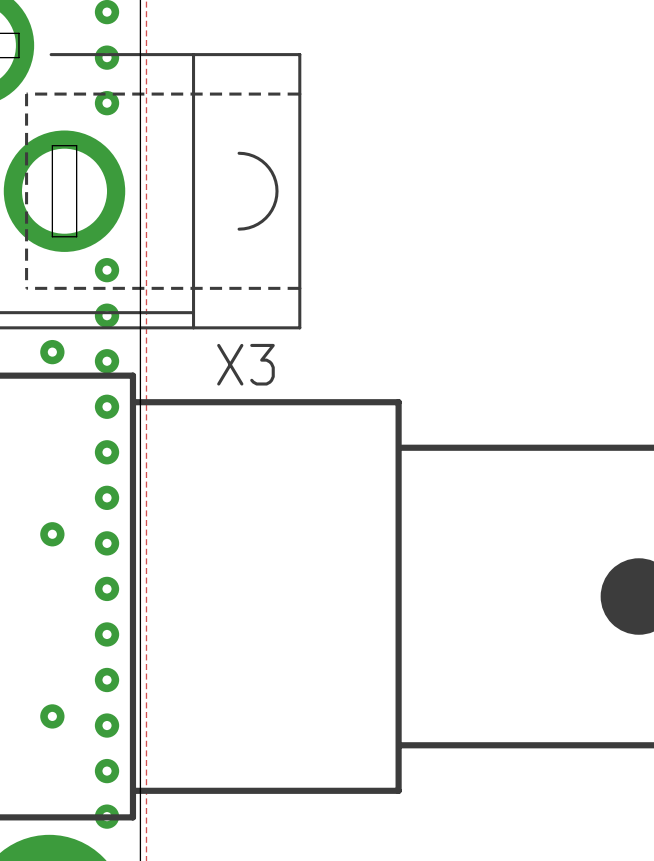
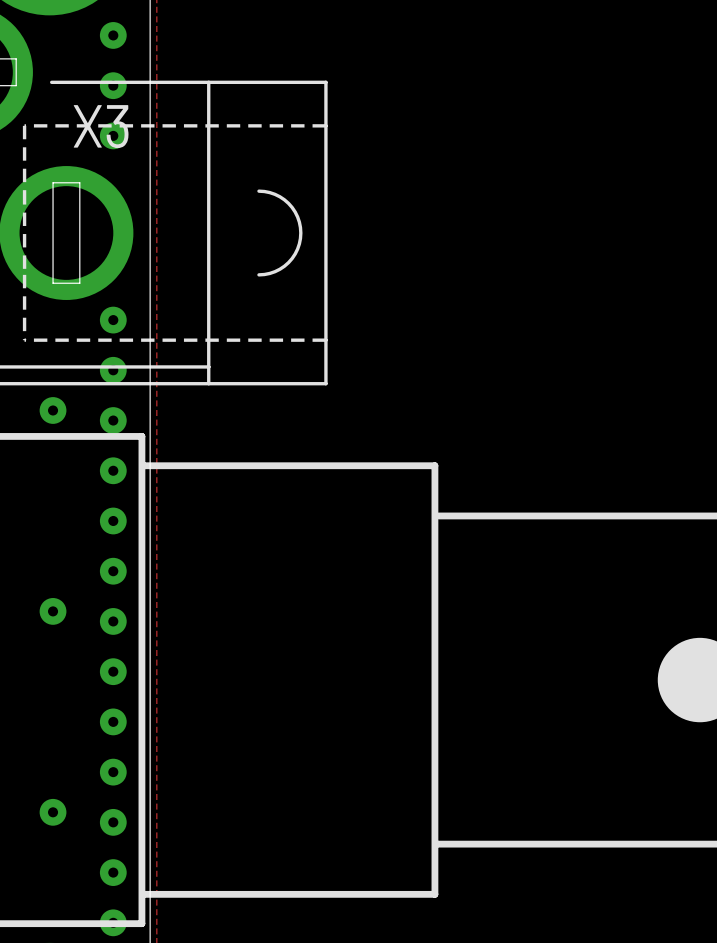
X3 name position: X3 (245, 364) -> X3 (101, 126)

